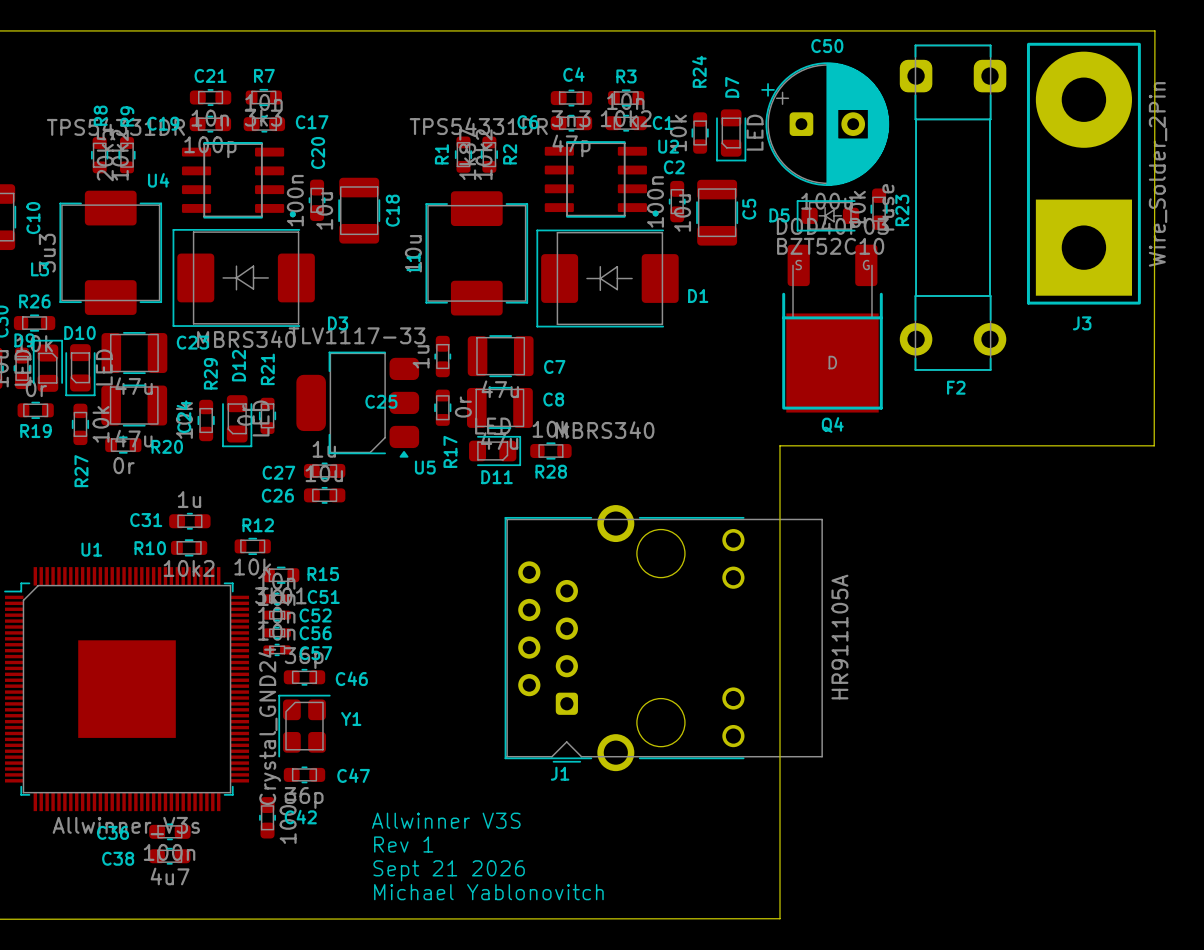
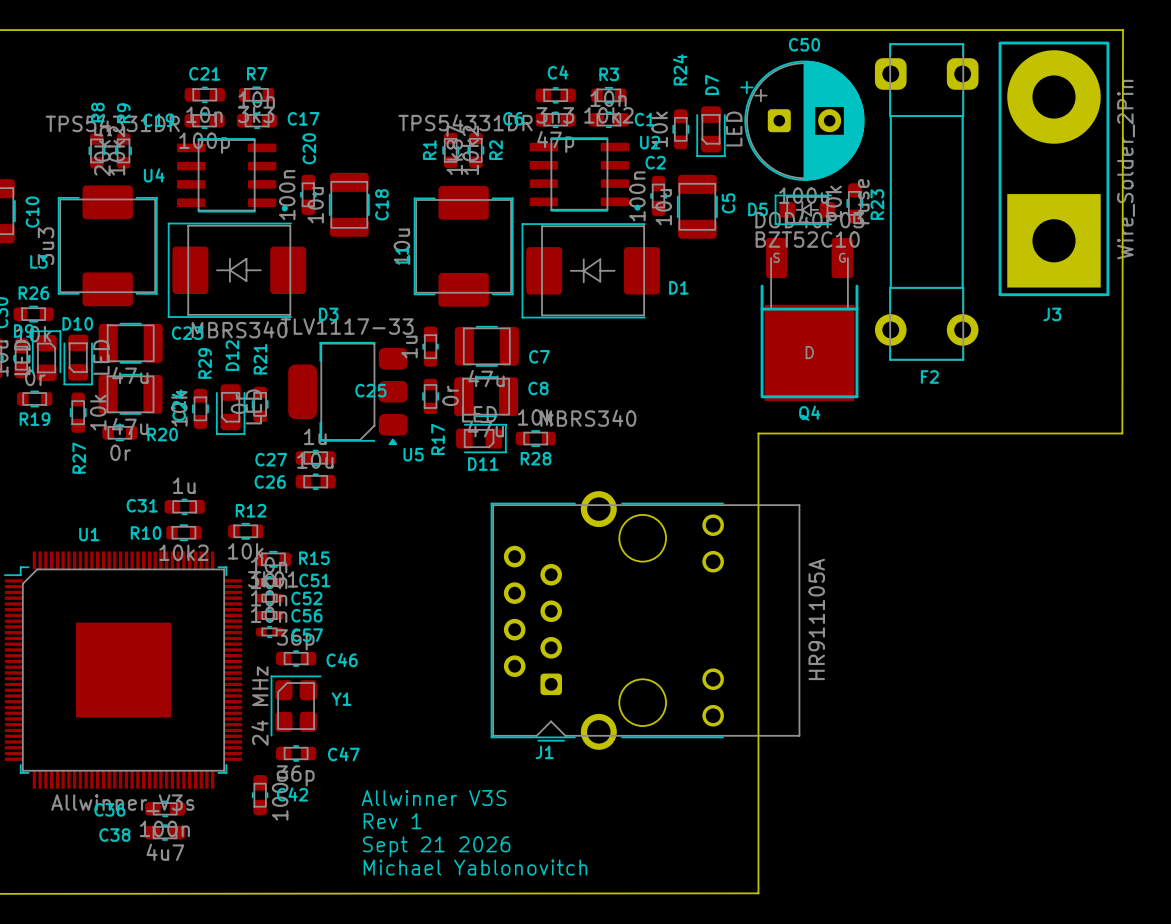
Y1 value: Crystal_GND24 (269, 725) -> 24 MHz (259, 706)

